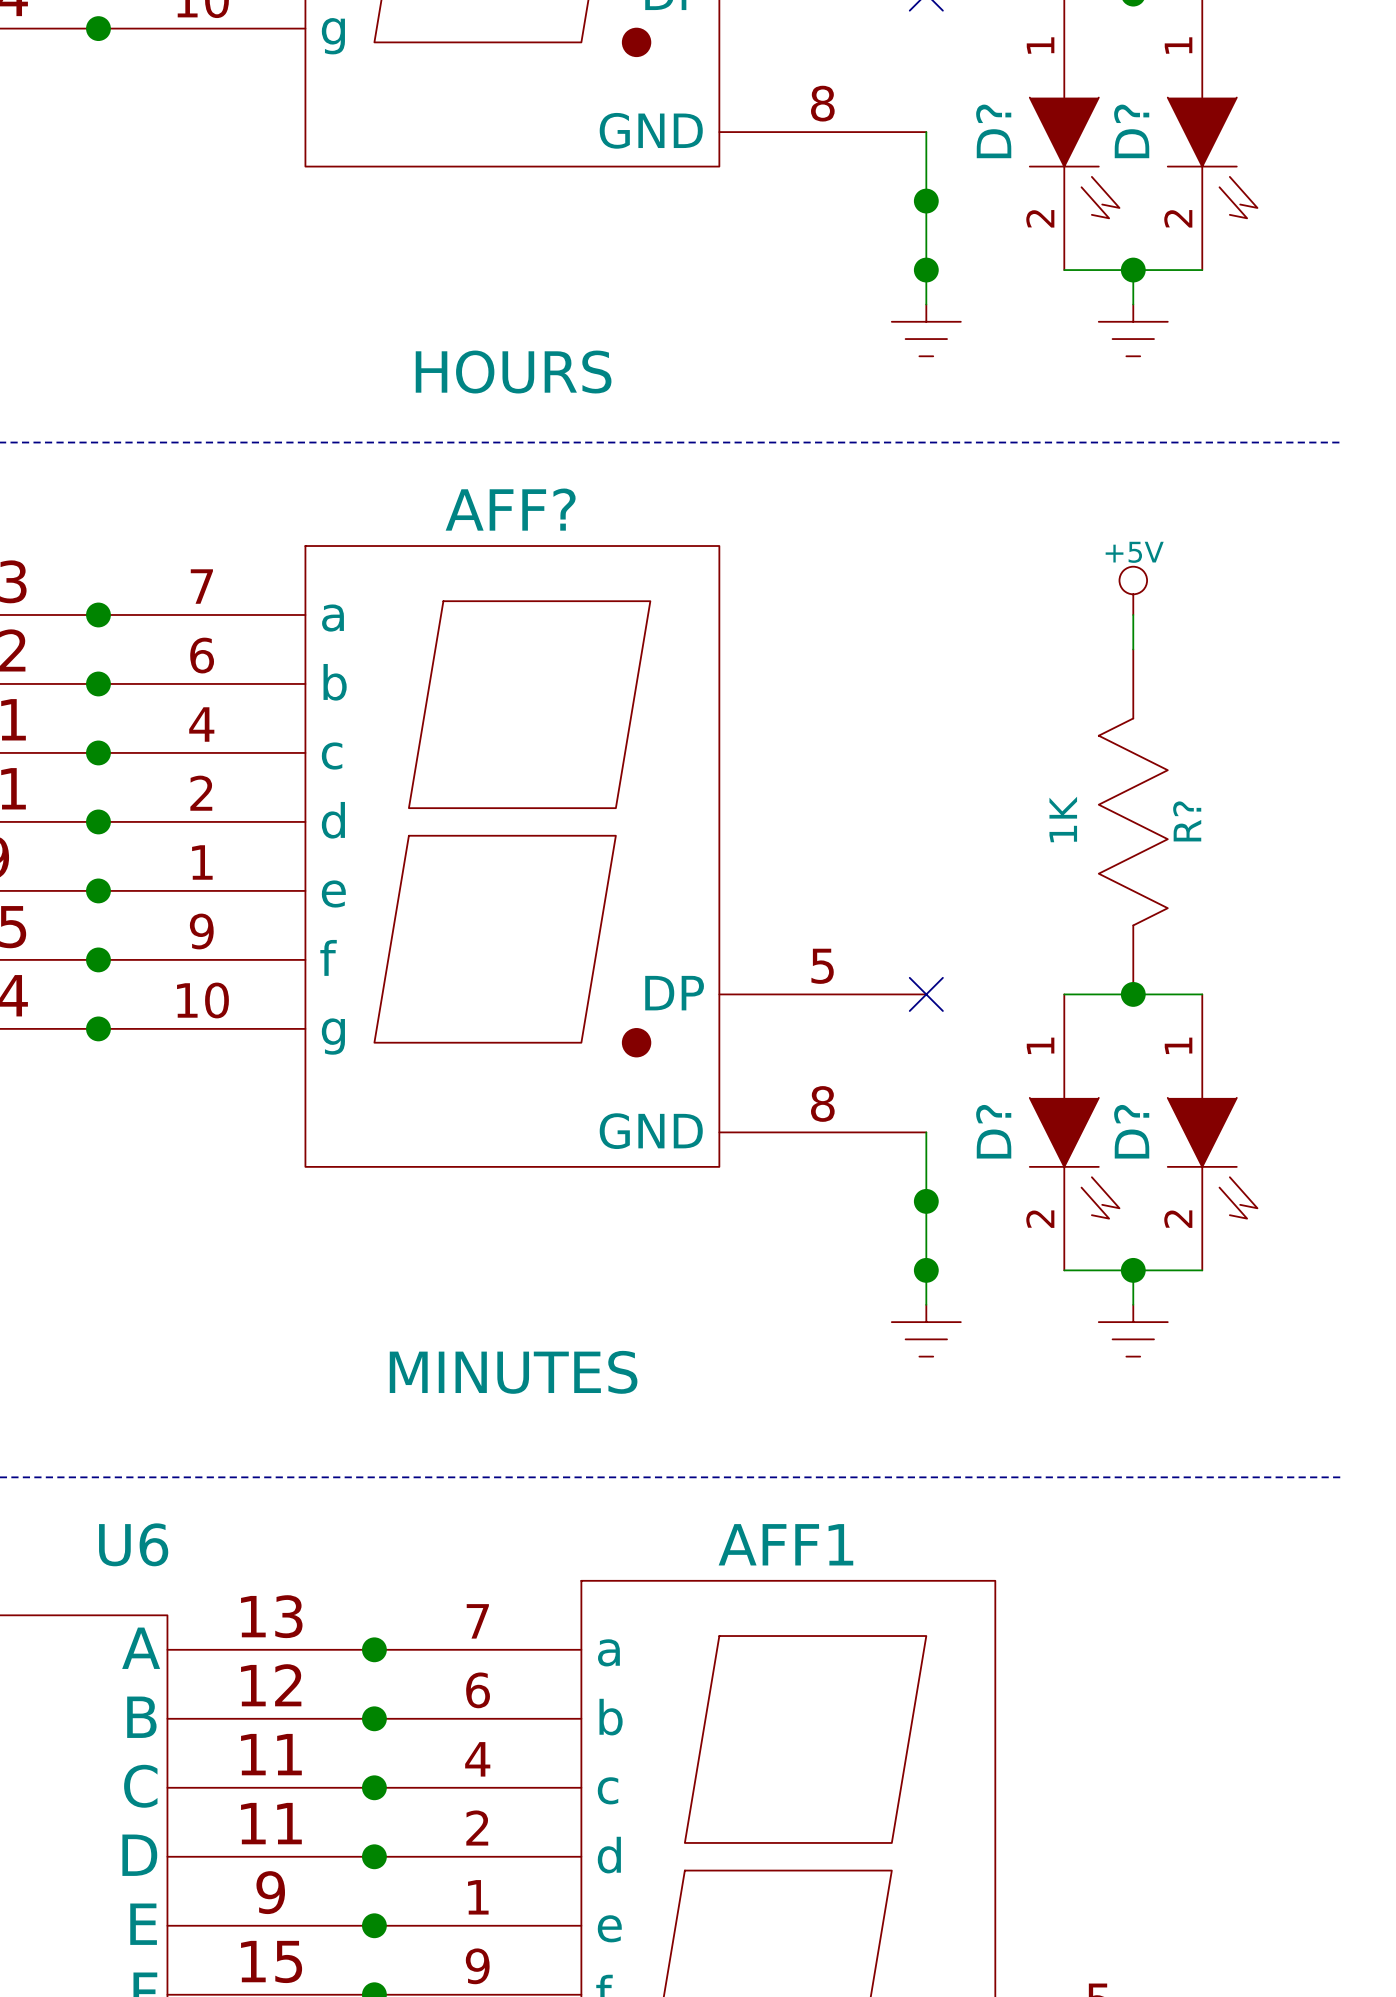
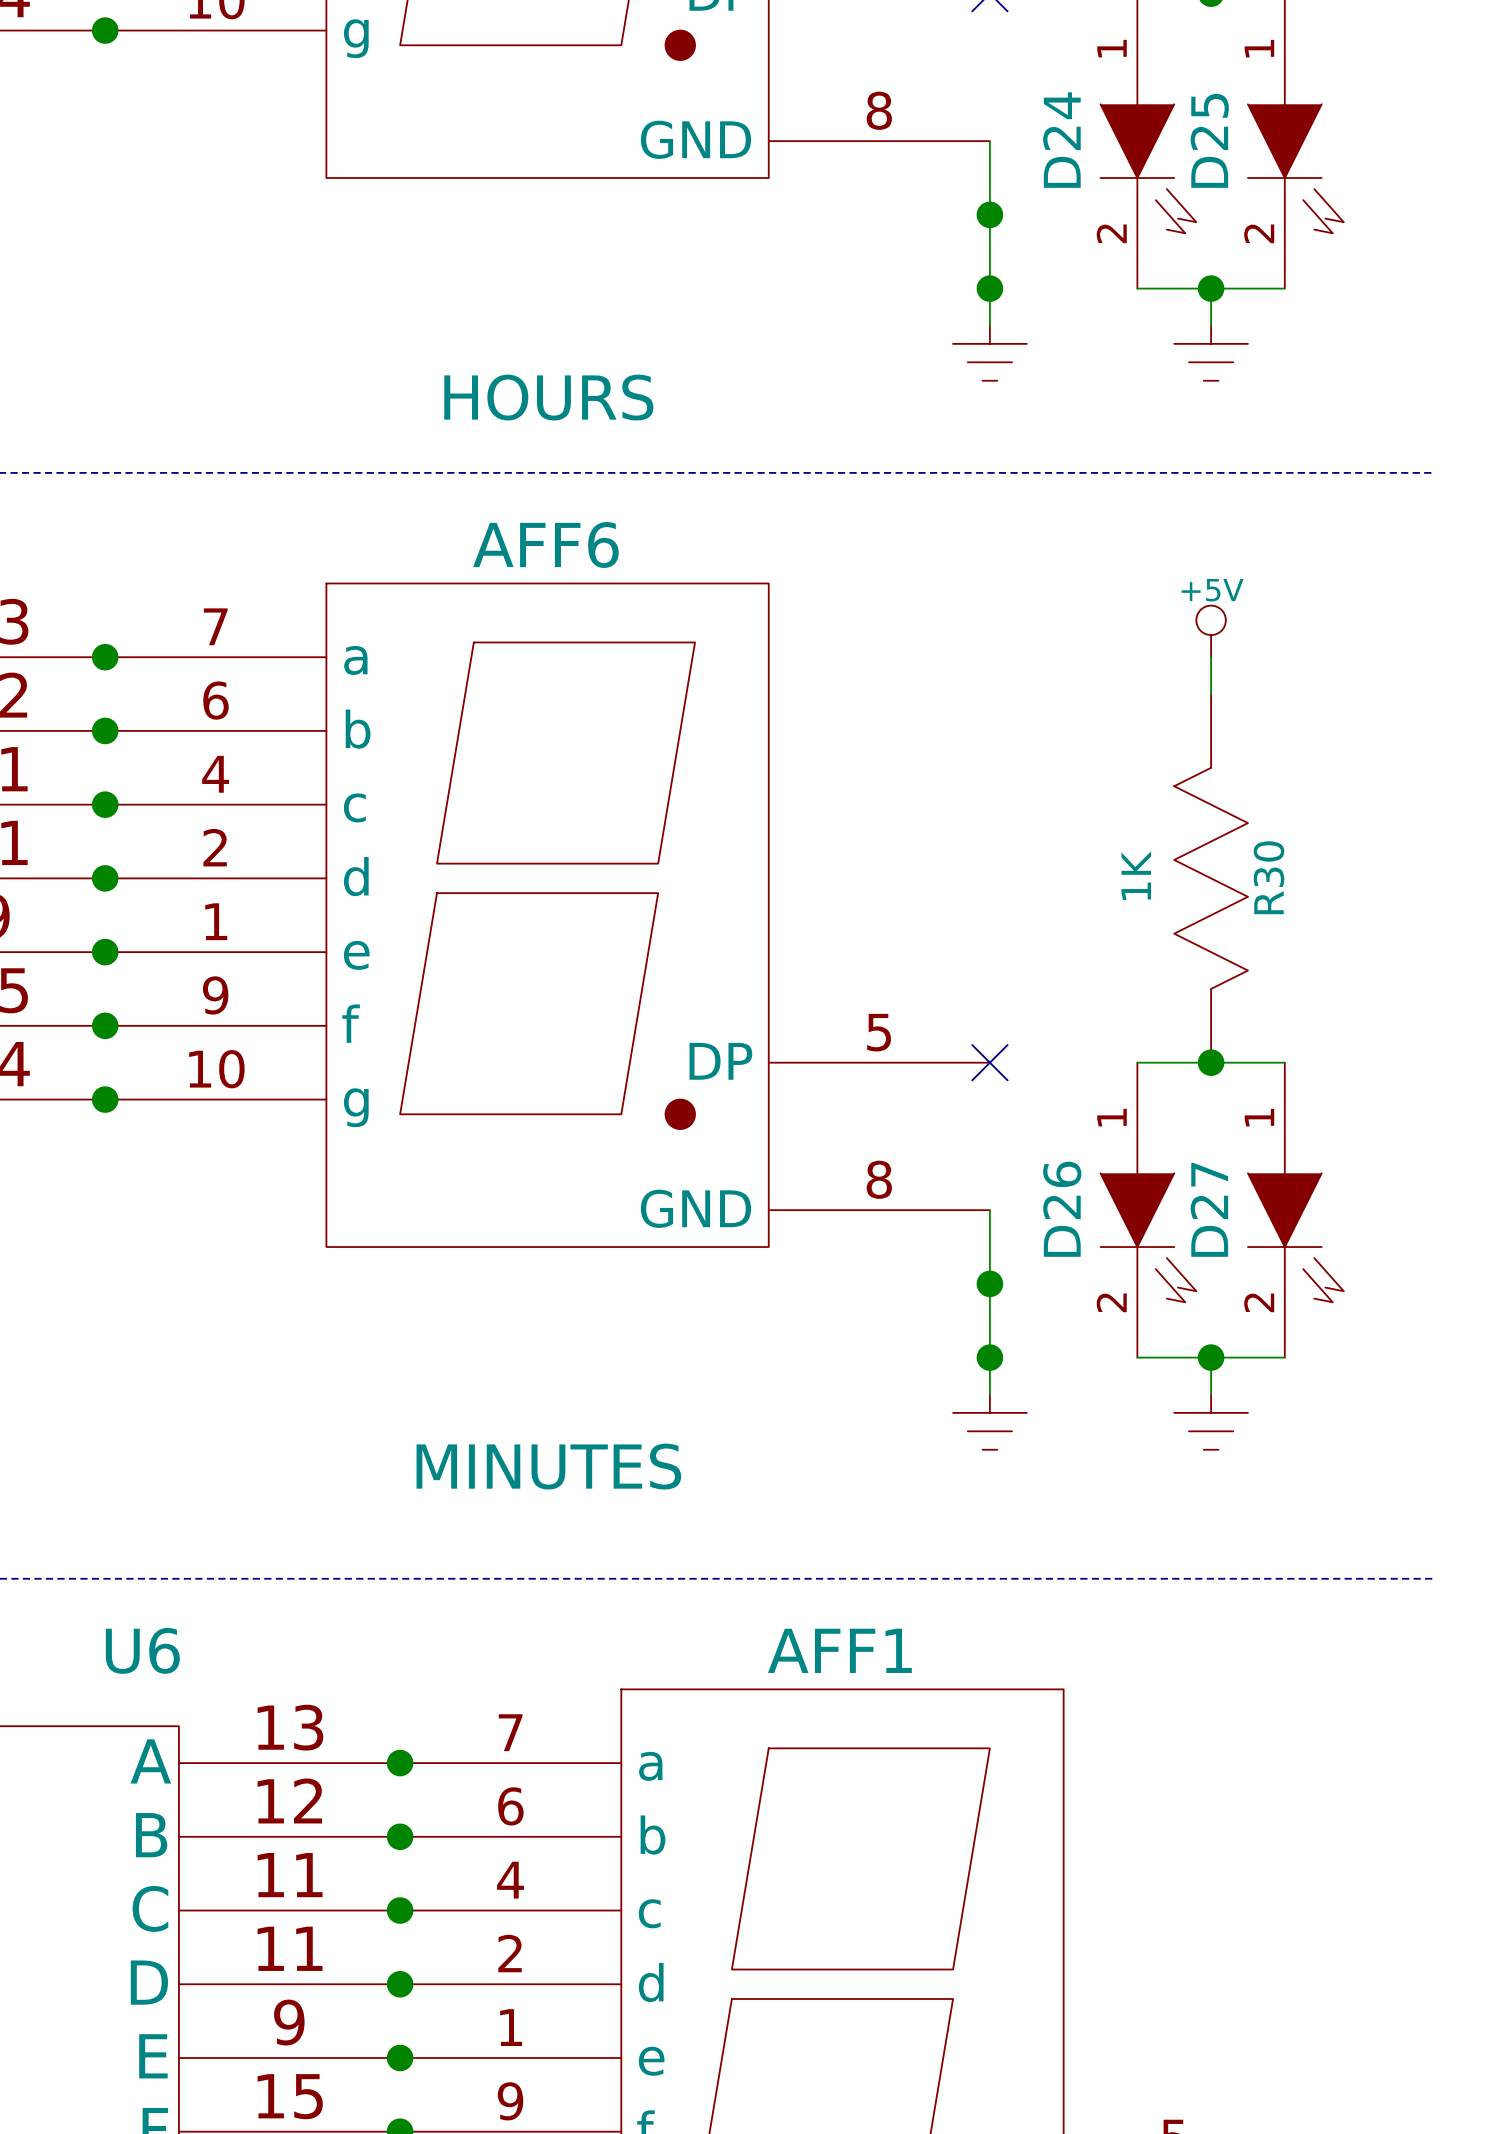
D? name: D? (993, 131) -> D24 (1061, 140)
D? name: D? (1131, 131) -> D25 (1209, 140)
AFF? name: AFF? (510, 509) -> AFF6 (545, 545)
R? name: R? (1187, 821) -> R30 (1268, 877)
D? name: D? (993, 1131) -> D26 (1062, 1209)
D? name: D? (1131, 1131) -> D27 (1209, 1209)

